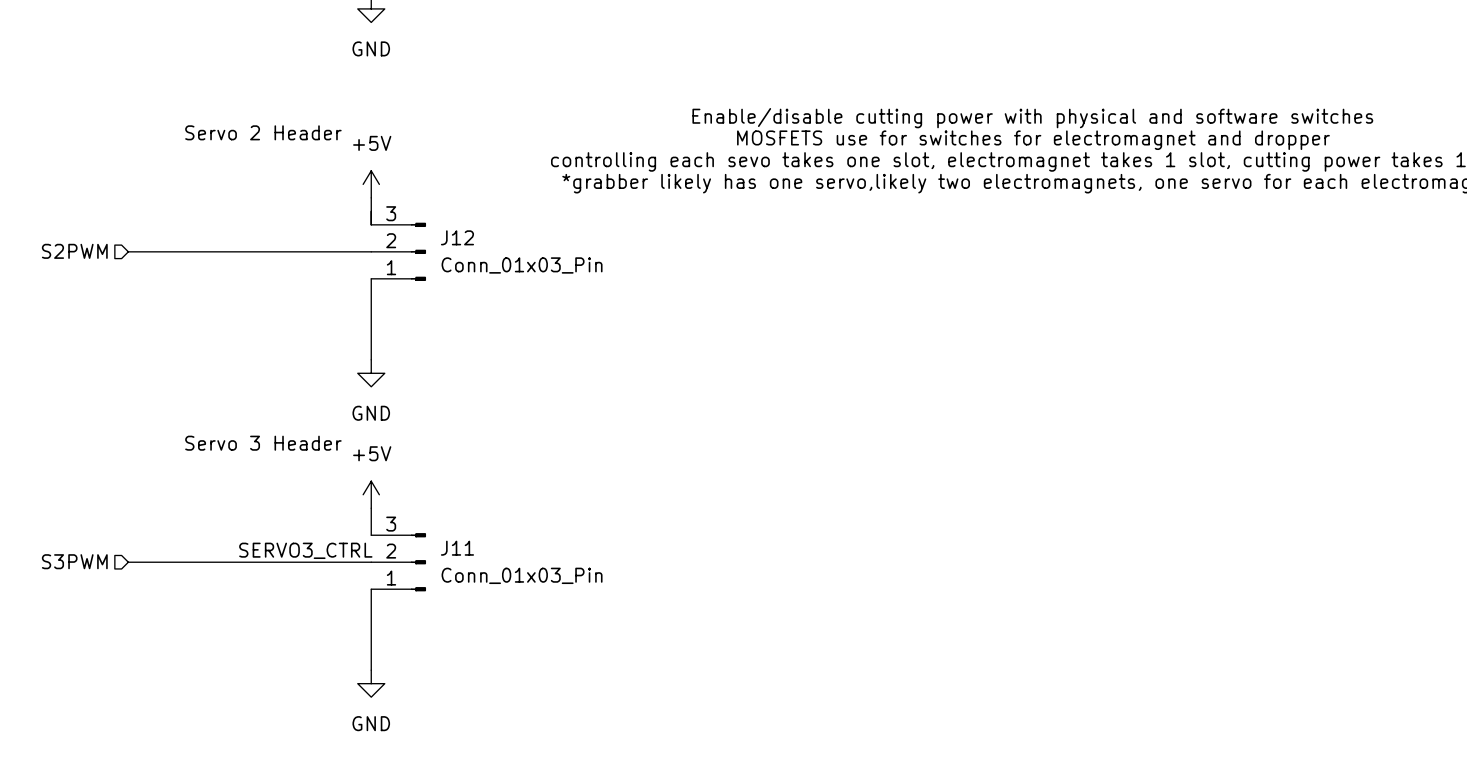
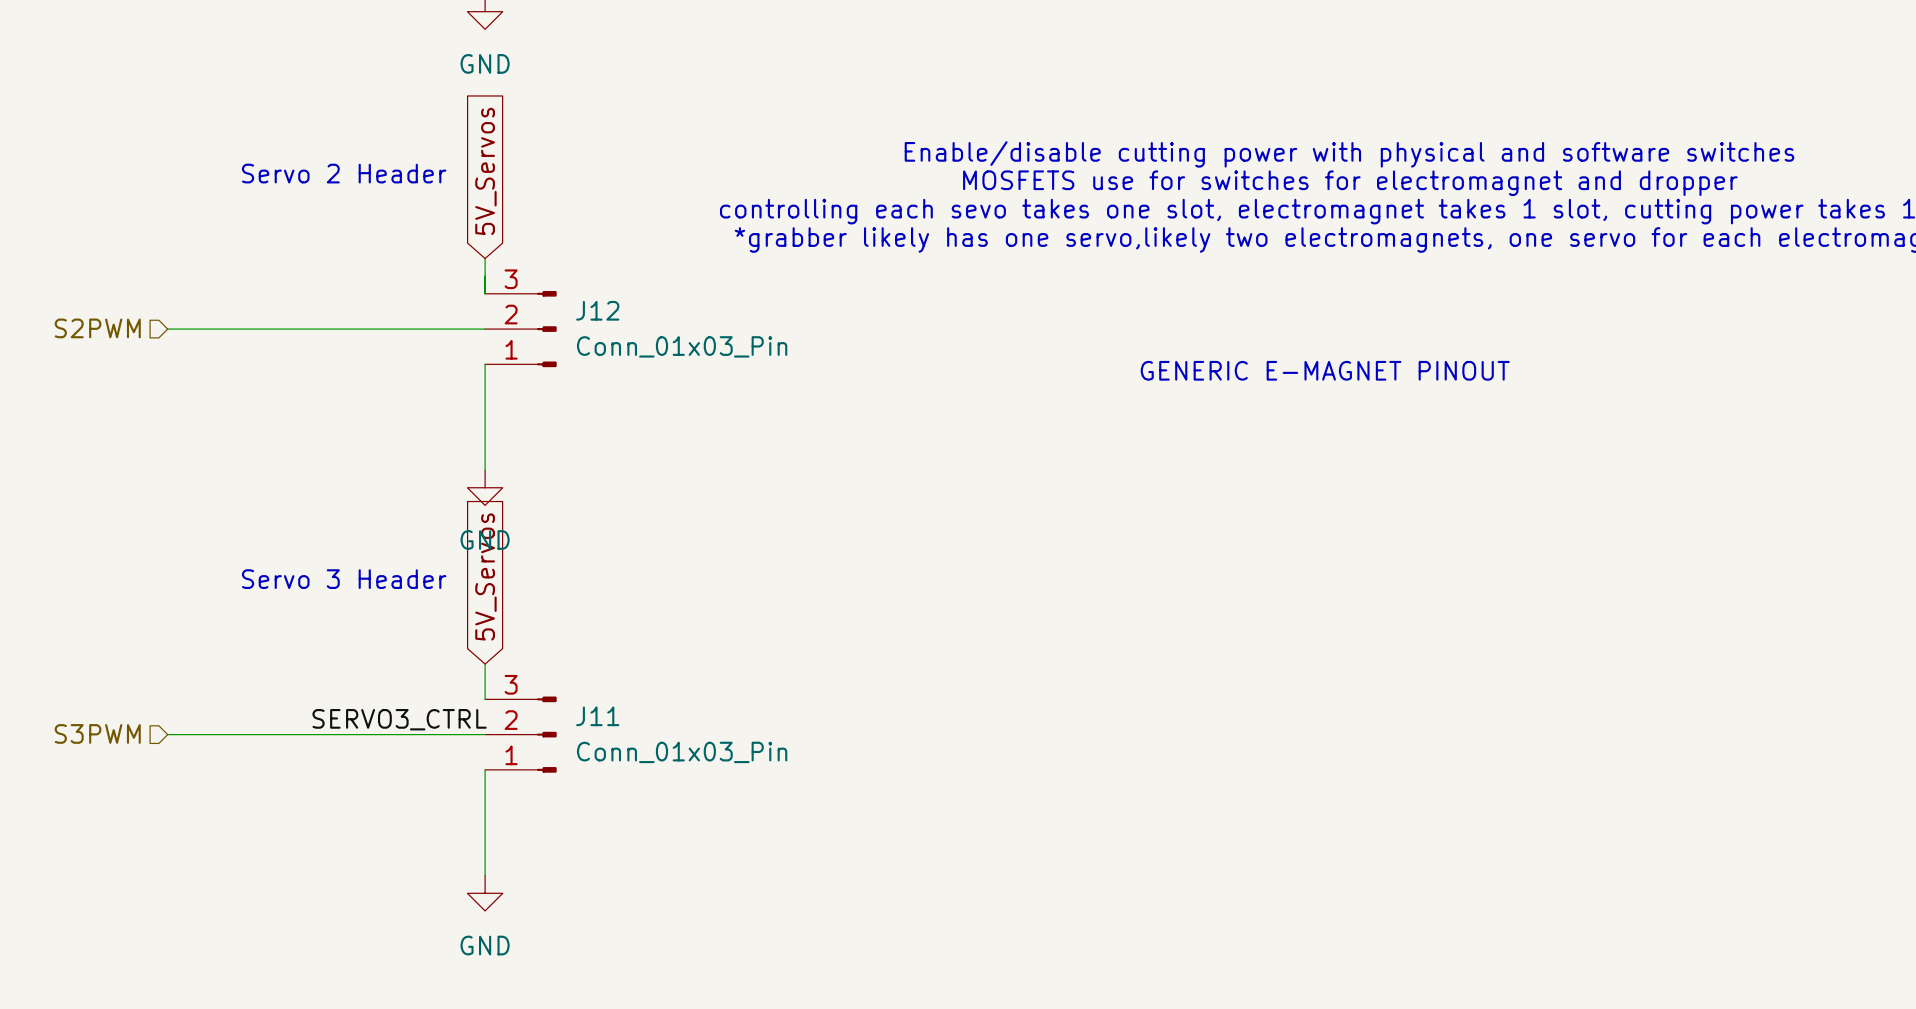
global label: none -> 5V_Servos (485, 171)
power symbol: +5V (371, 184) -> none
text: none -> GENERIC E-MAGNET PINOUT (1325, 370)
global label: none -> 5V_Servos (485, 576)
power symbol: +5V (371, 494) -> none

